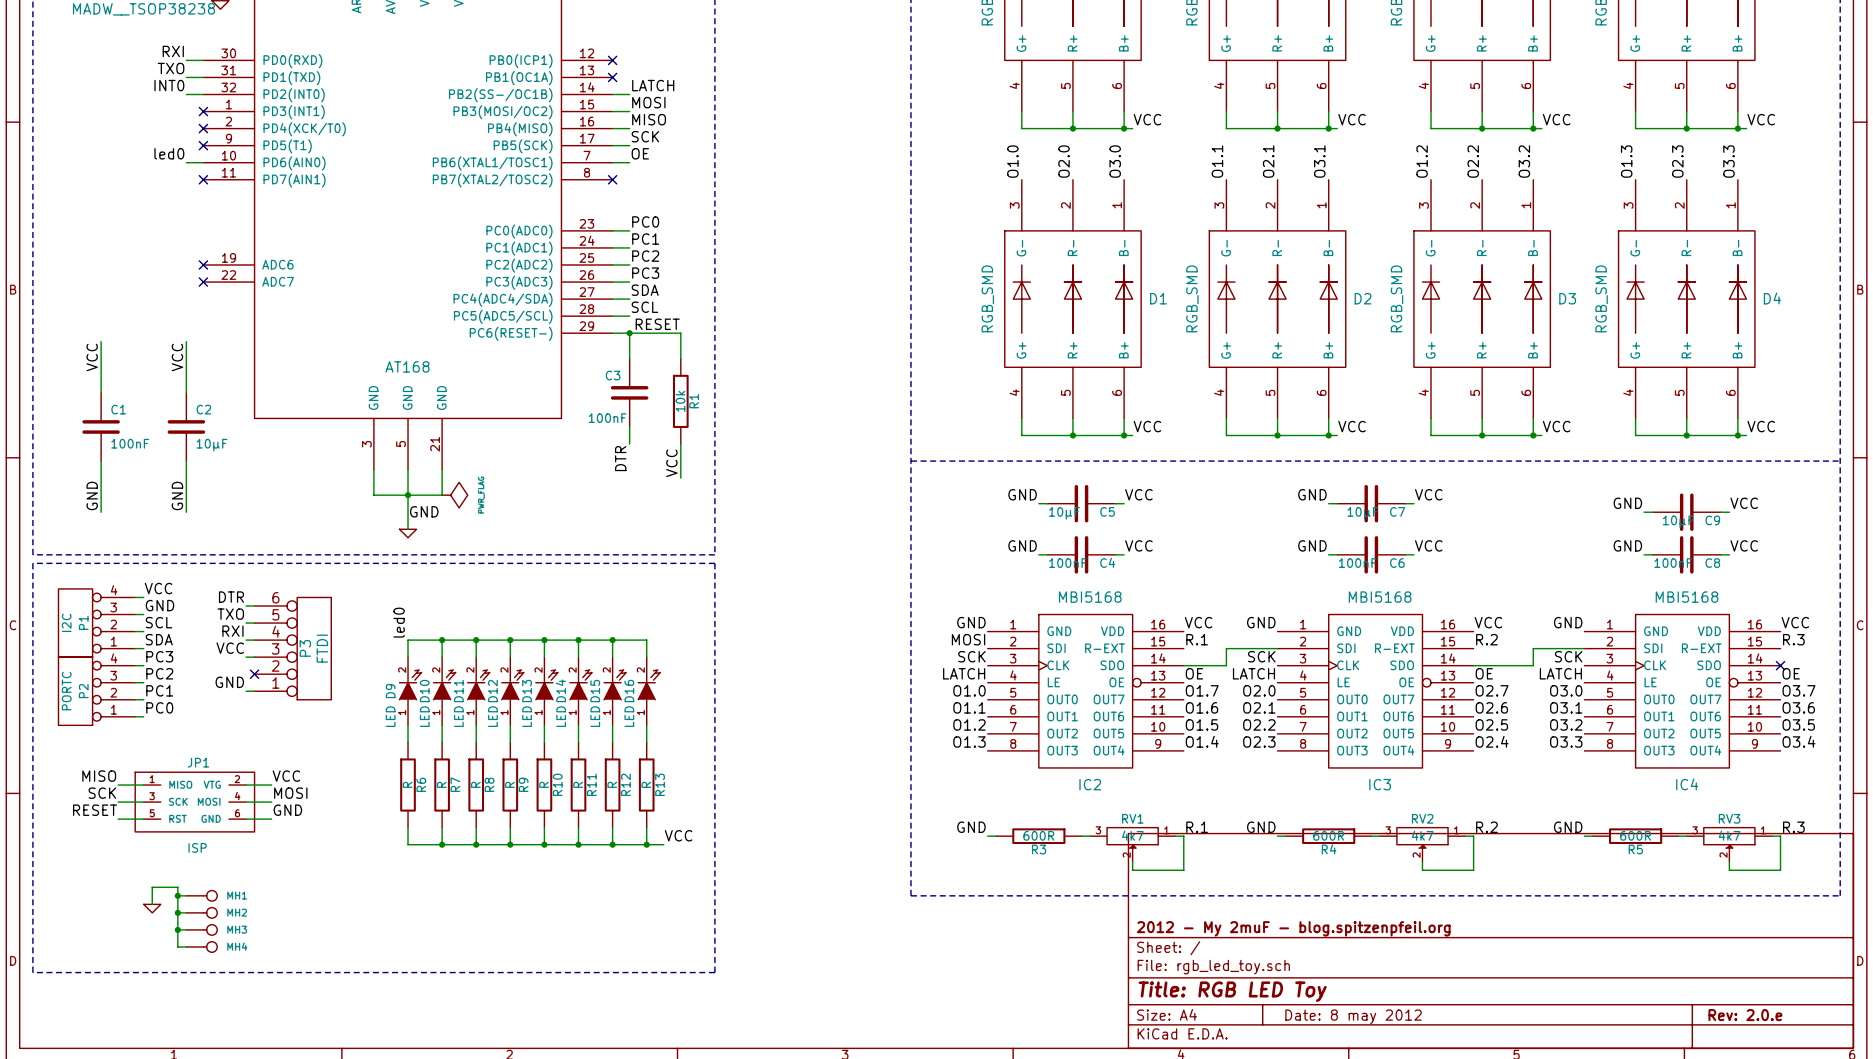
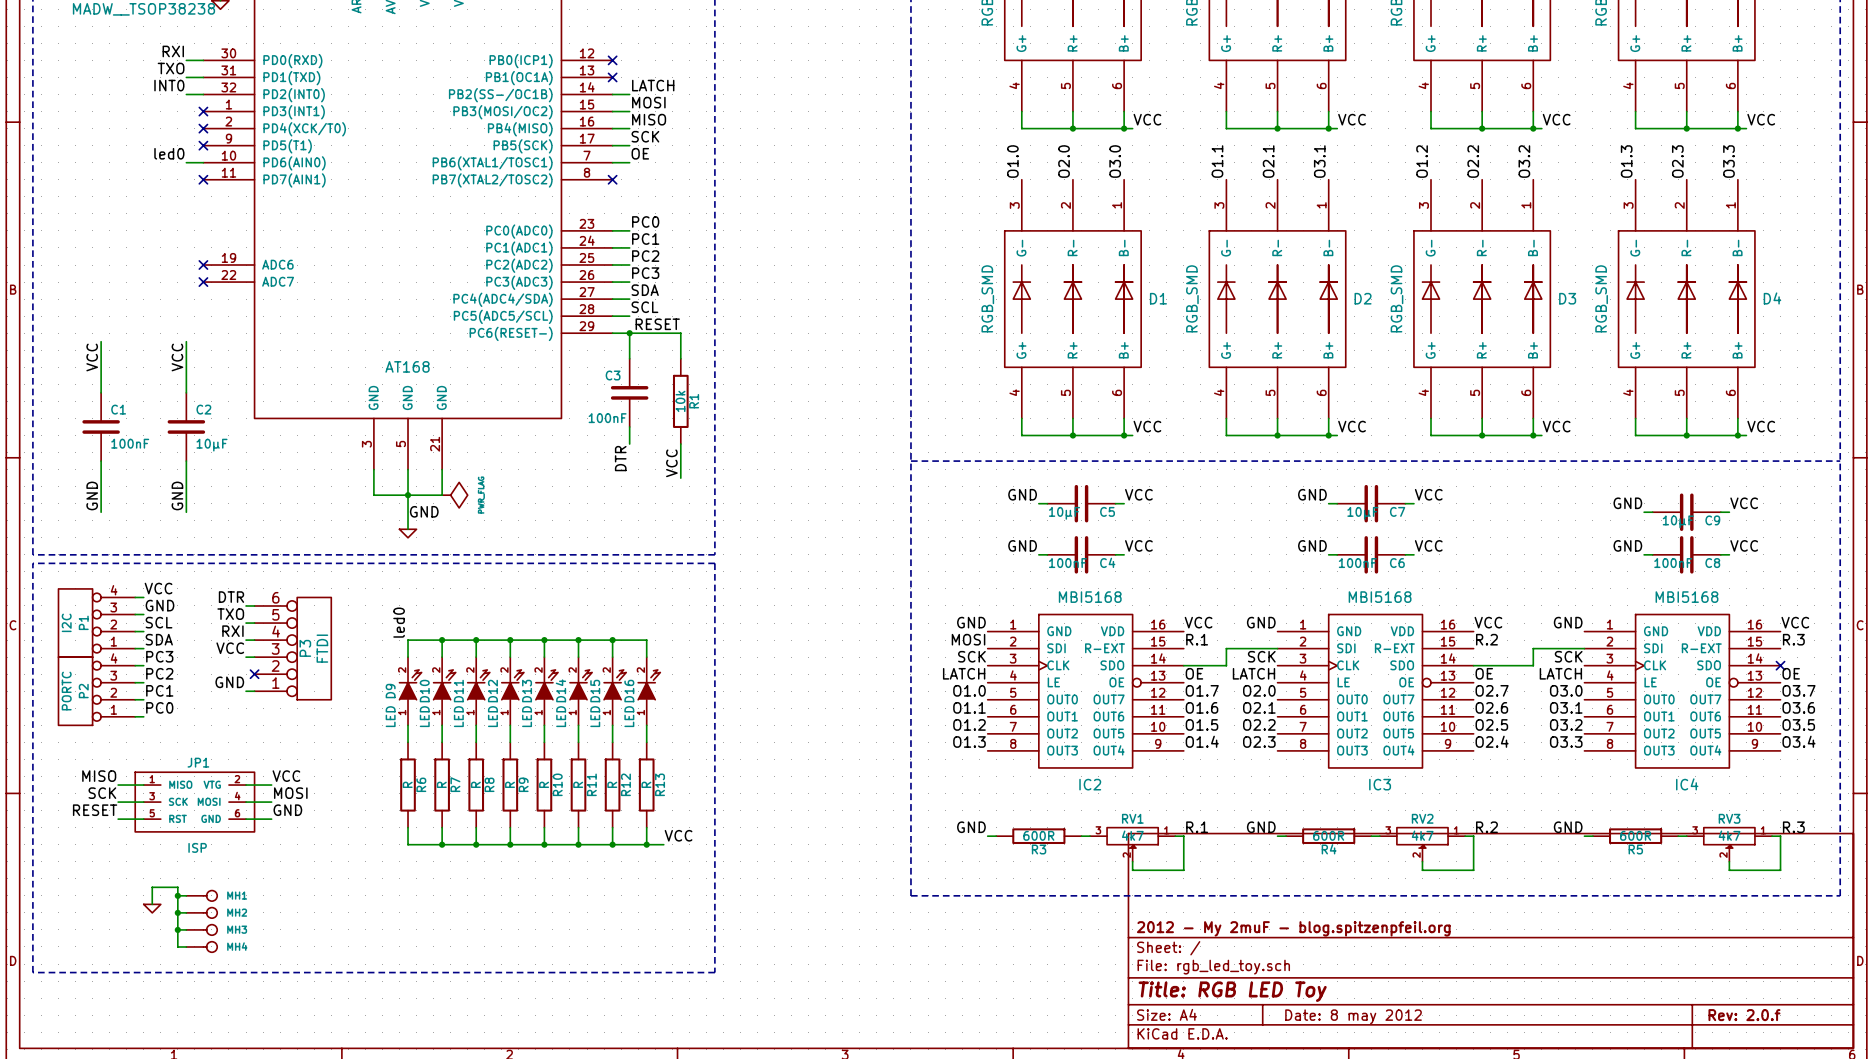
title block: Rev: 2.0.e (1745, 1015) -> Rev: 2.0.f (1744, 1015)

